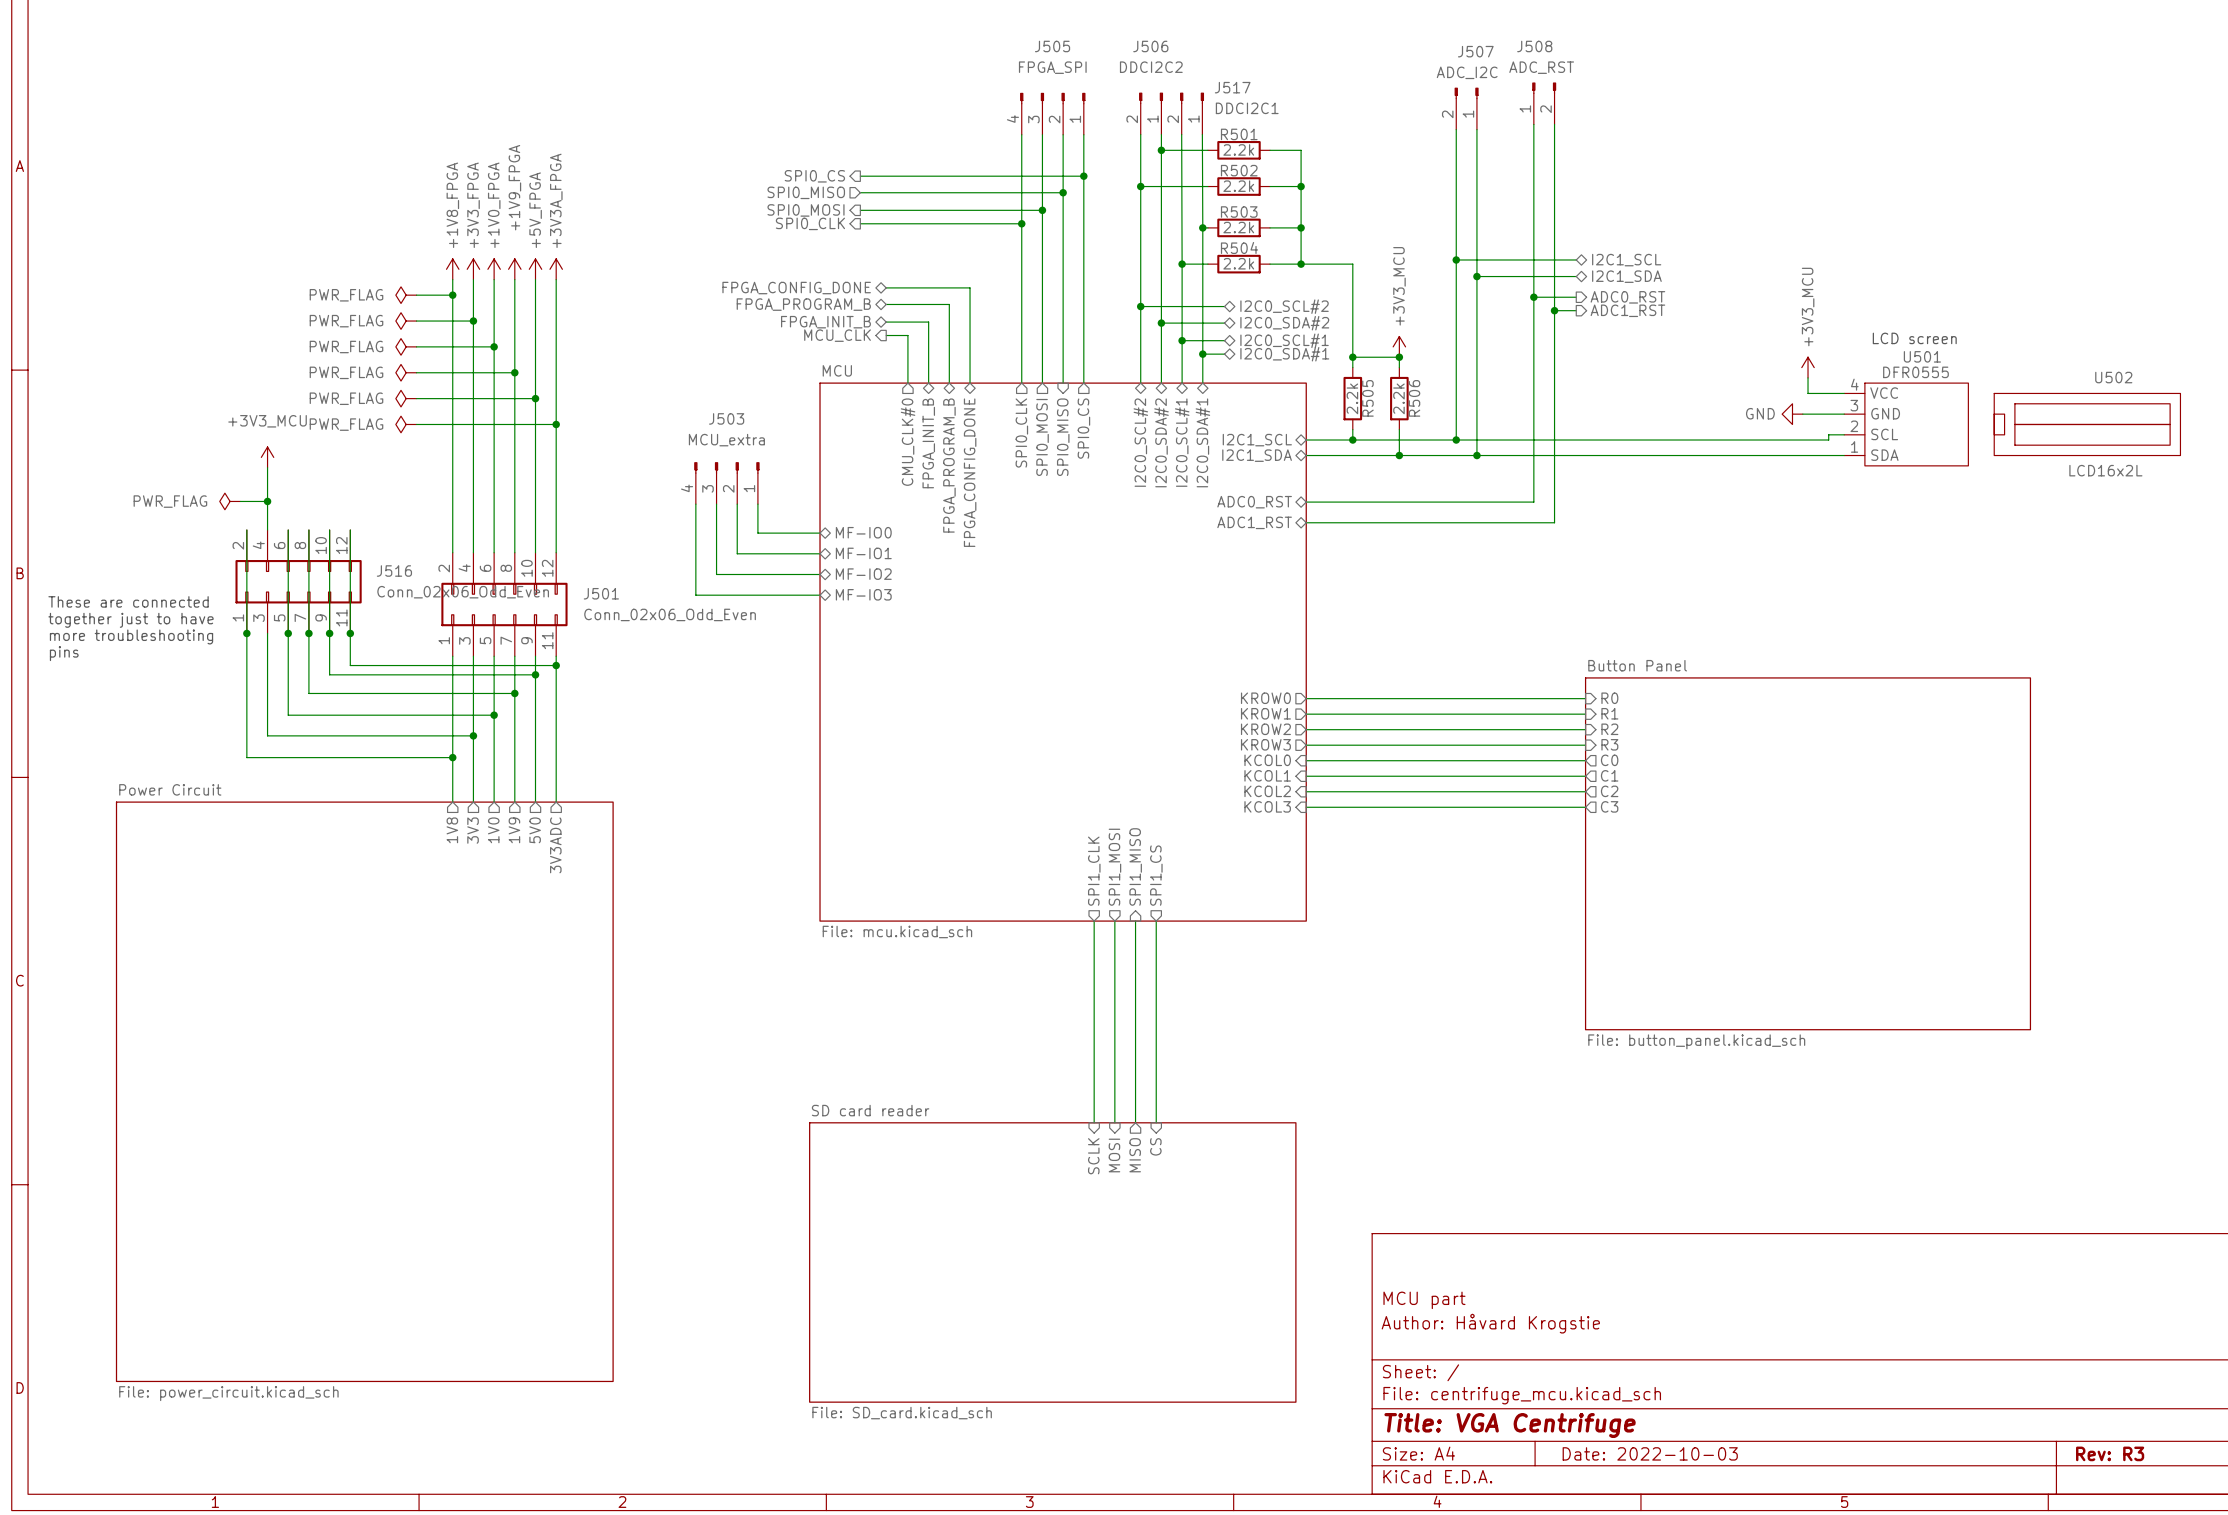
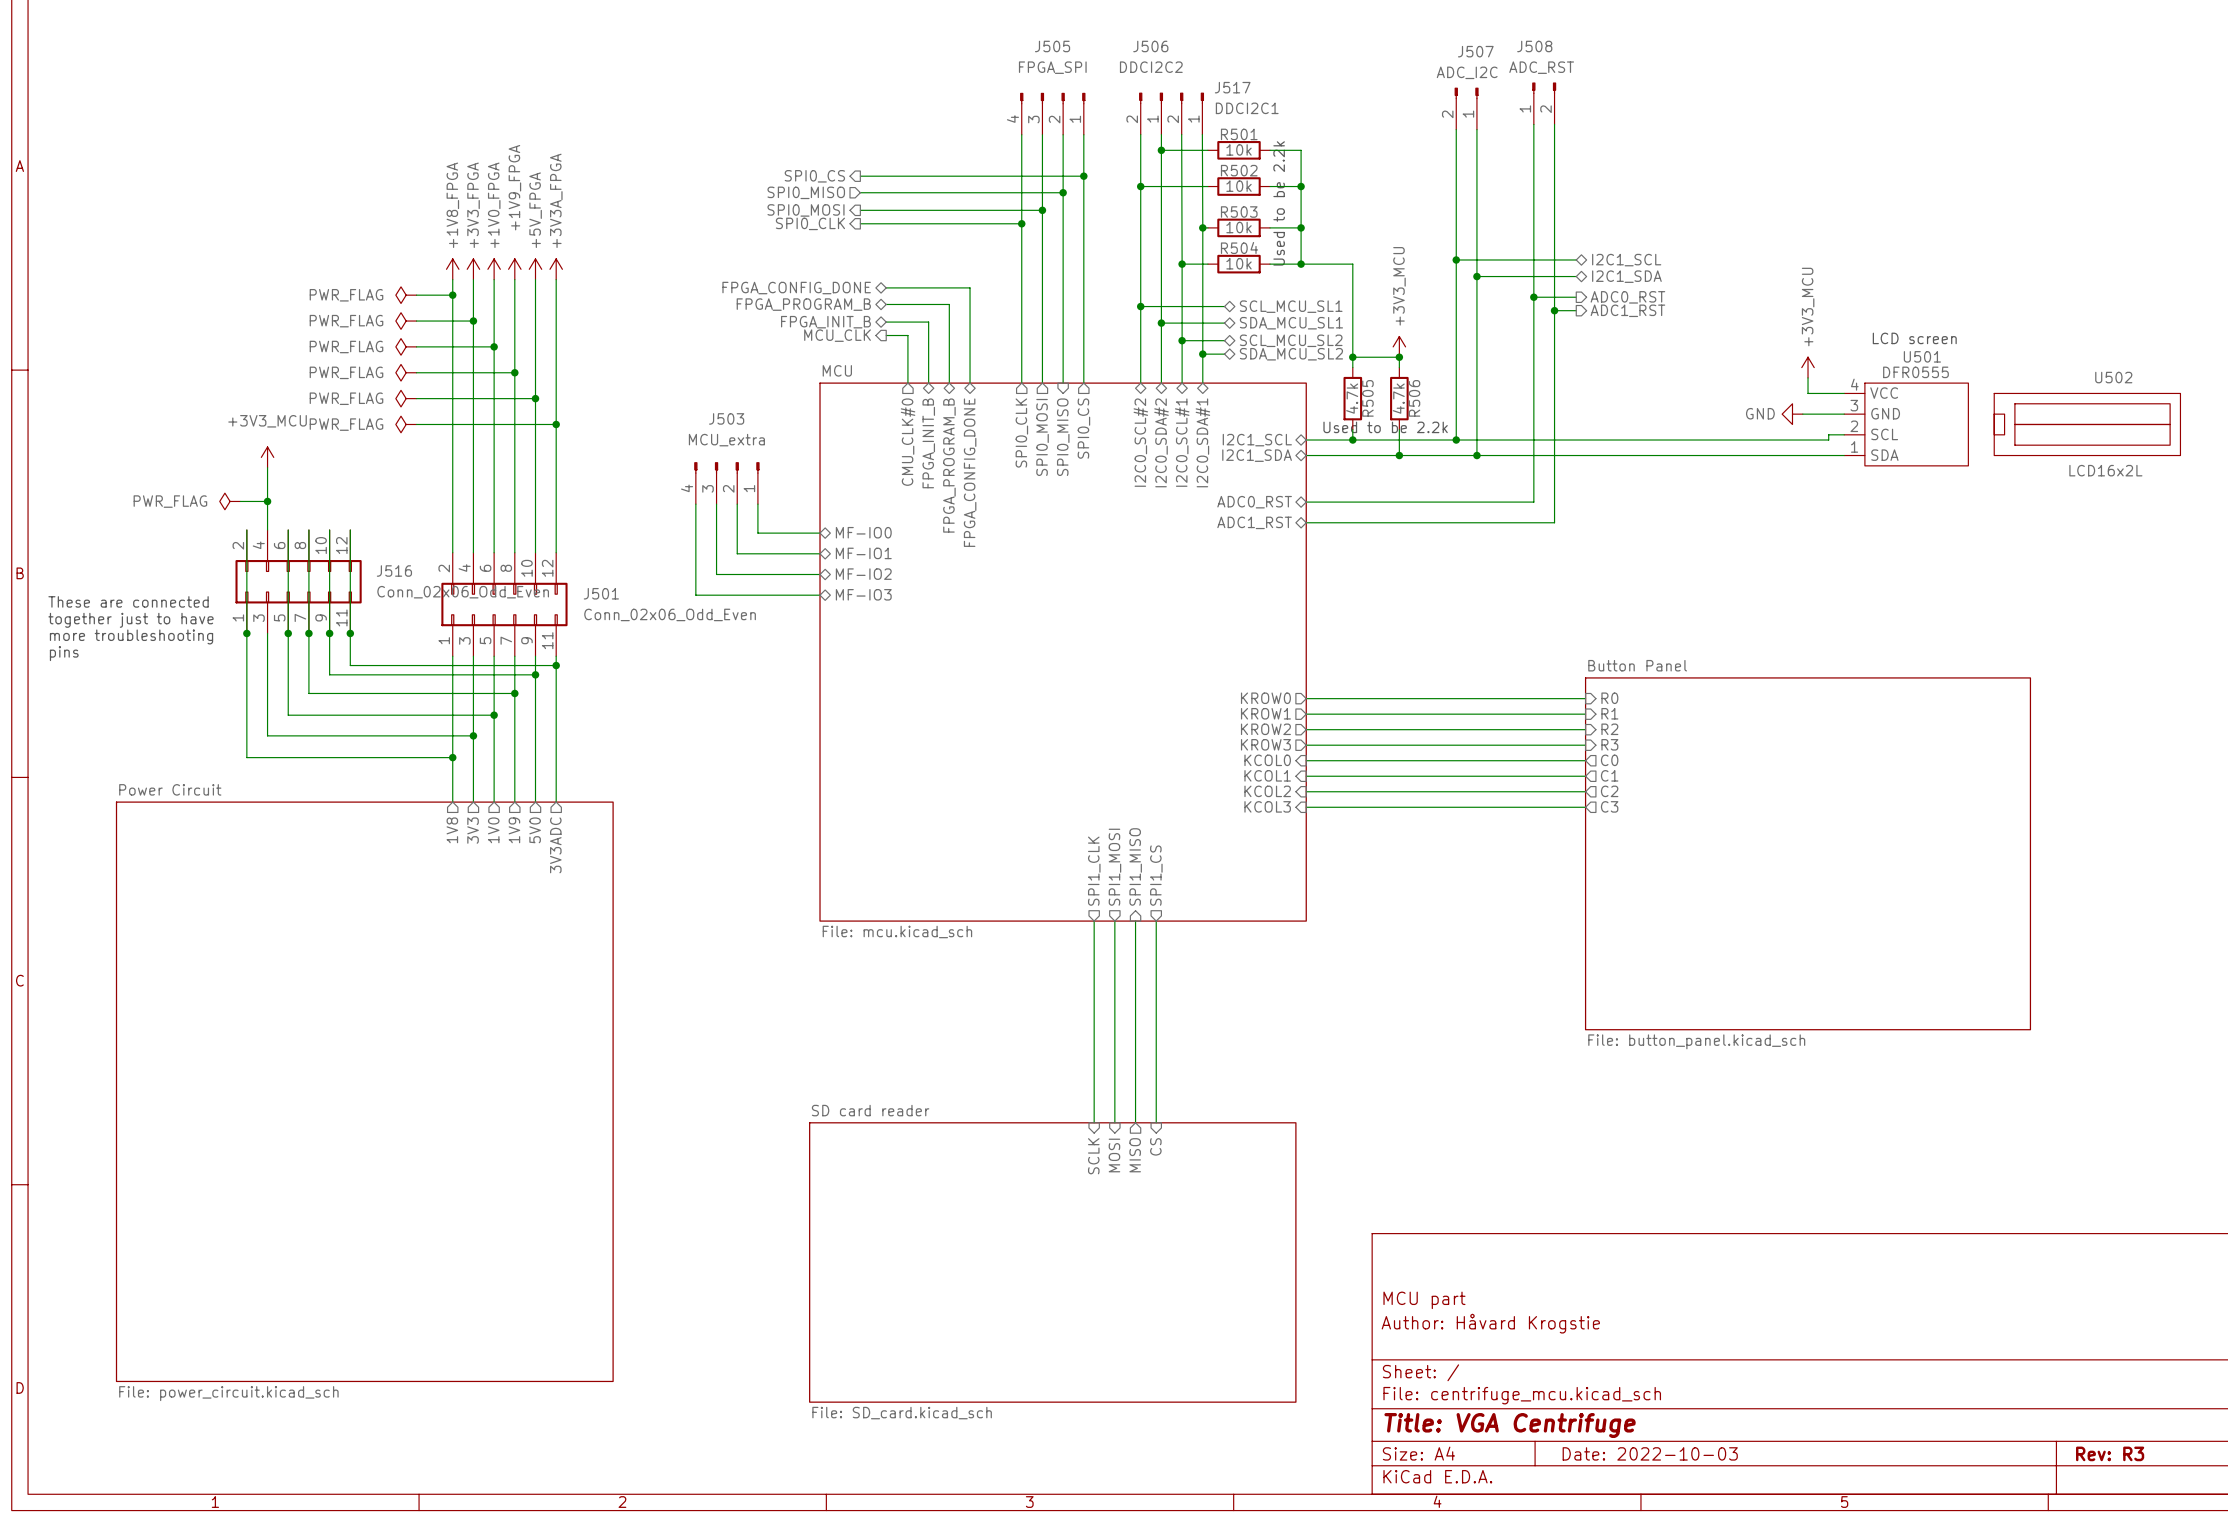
R501 value: 2.2k (1238, 149) -> 10k (1239, 149)
R502 value: 2.2k (1238, 186) -> 10k (1239, 186)
text: none -> Used to be 2.2k (1279, 203)
R503 value: 2.2k (1238, 227) -> 10k (1239, 227)
R504 value: 2.2k (1238, 263) -> 10k (1239, 263)
hierarchical label: I2C0_SCL#2 (1284, 306) -> SCL_MCU_SL1 (1291, 306)
hierarchical label: I2C0_SDA#2 (1284, 323) -> SDA_MCU_SL1 (1291, 323)
hierarchical label: I2C0_SCL#1 (1284, 340) -> SCL_MCU_SL2 (1291, 340)
hierarchical label: I2C0_SDA#1 (1284, 354) -> SDA_MCU_SL2 (1291, 354)
R505 value: 2.2k (1352, 398) -> 4.7k (1352, 398)
R506 value: 2.2k (1398, 398) -> 4.7k (1398, 398)
text: none -> Used to be 2.2k (1385, 427)

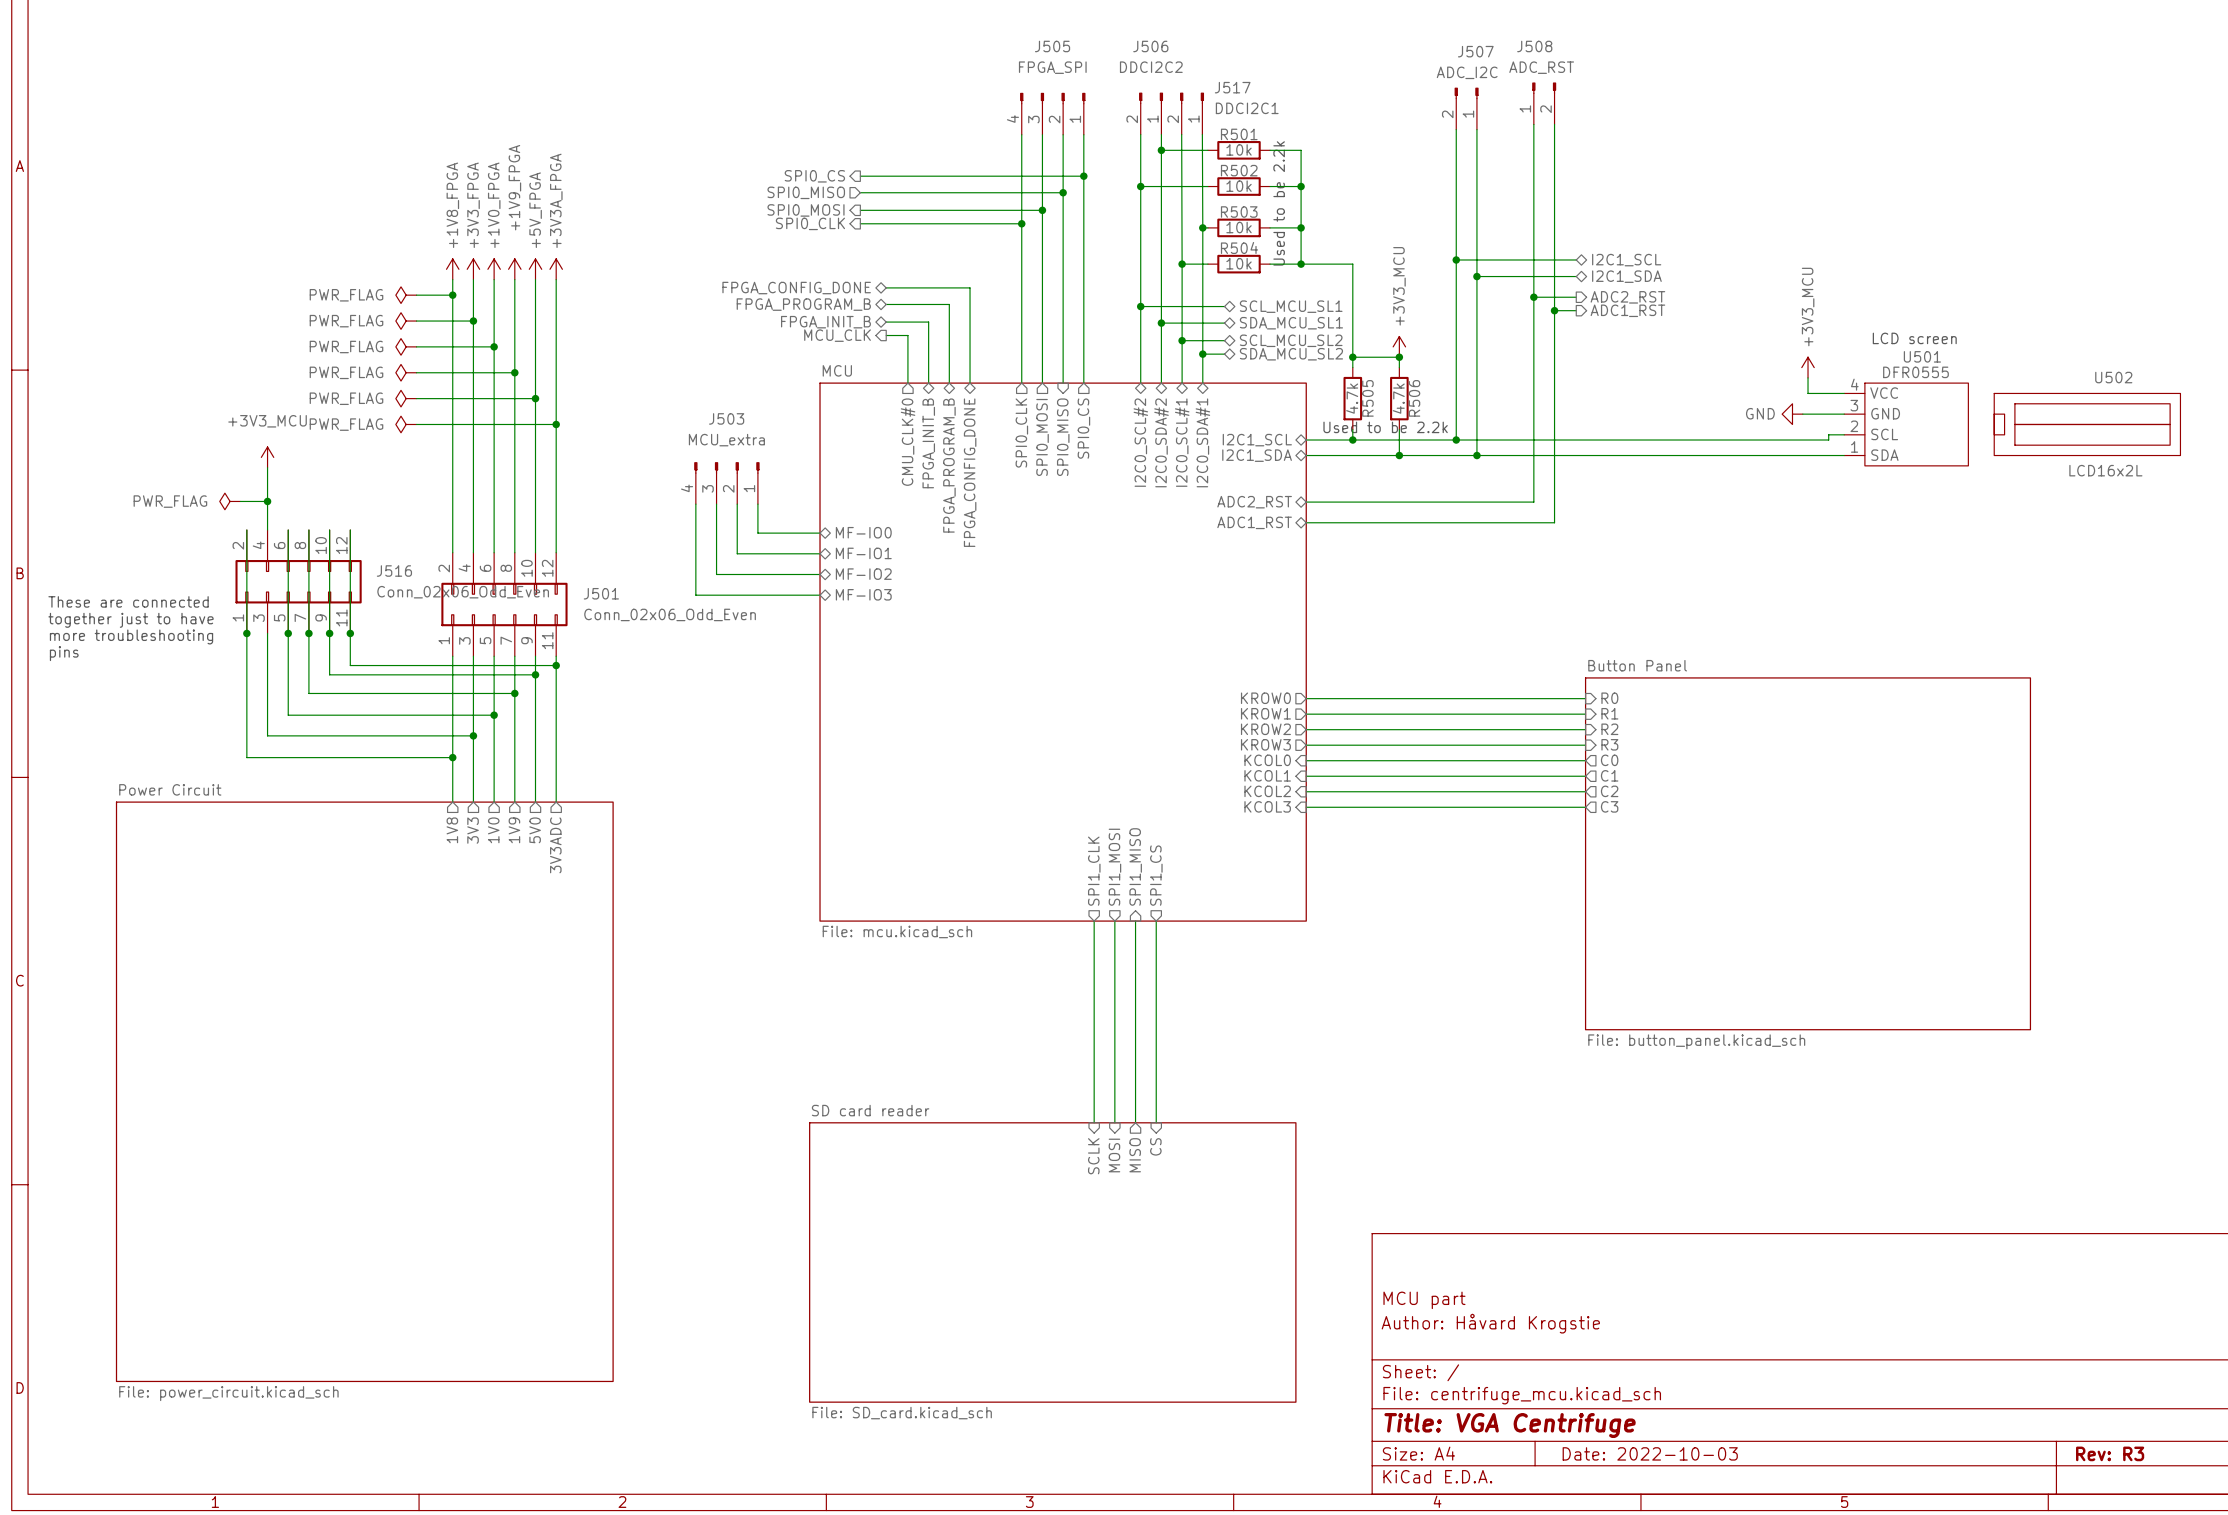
hierarchical label: ADC0_RST (1627, 297) -> ADC2_RST (1627, 297)
sheet pin: ADC0_RST (1254, 502) -> ADC2_RST (1254, 502)

